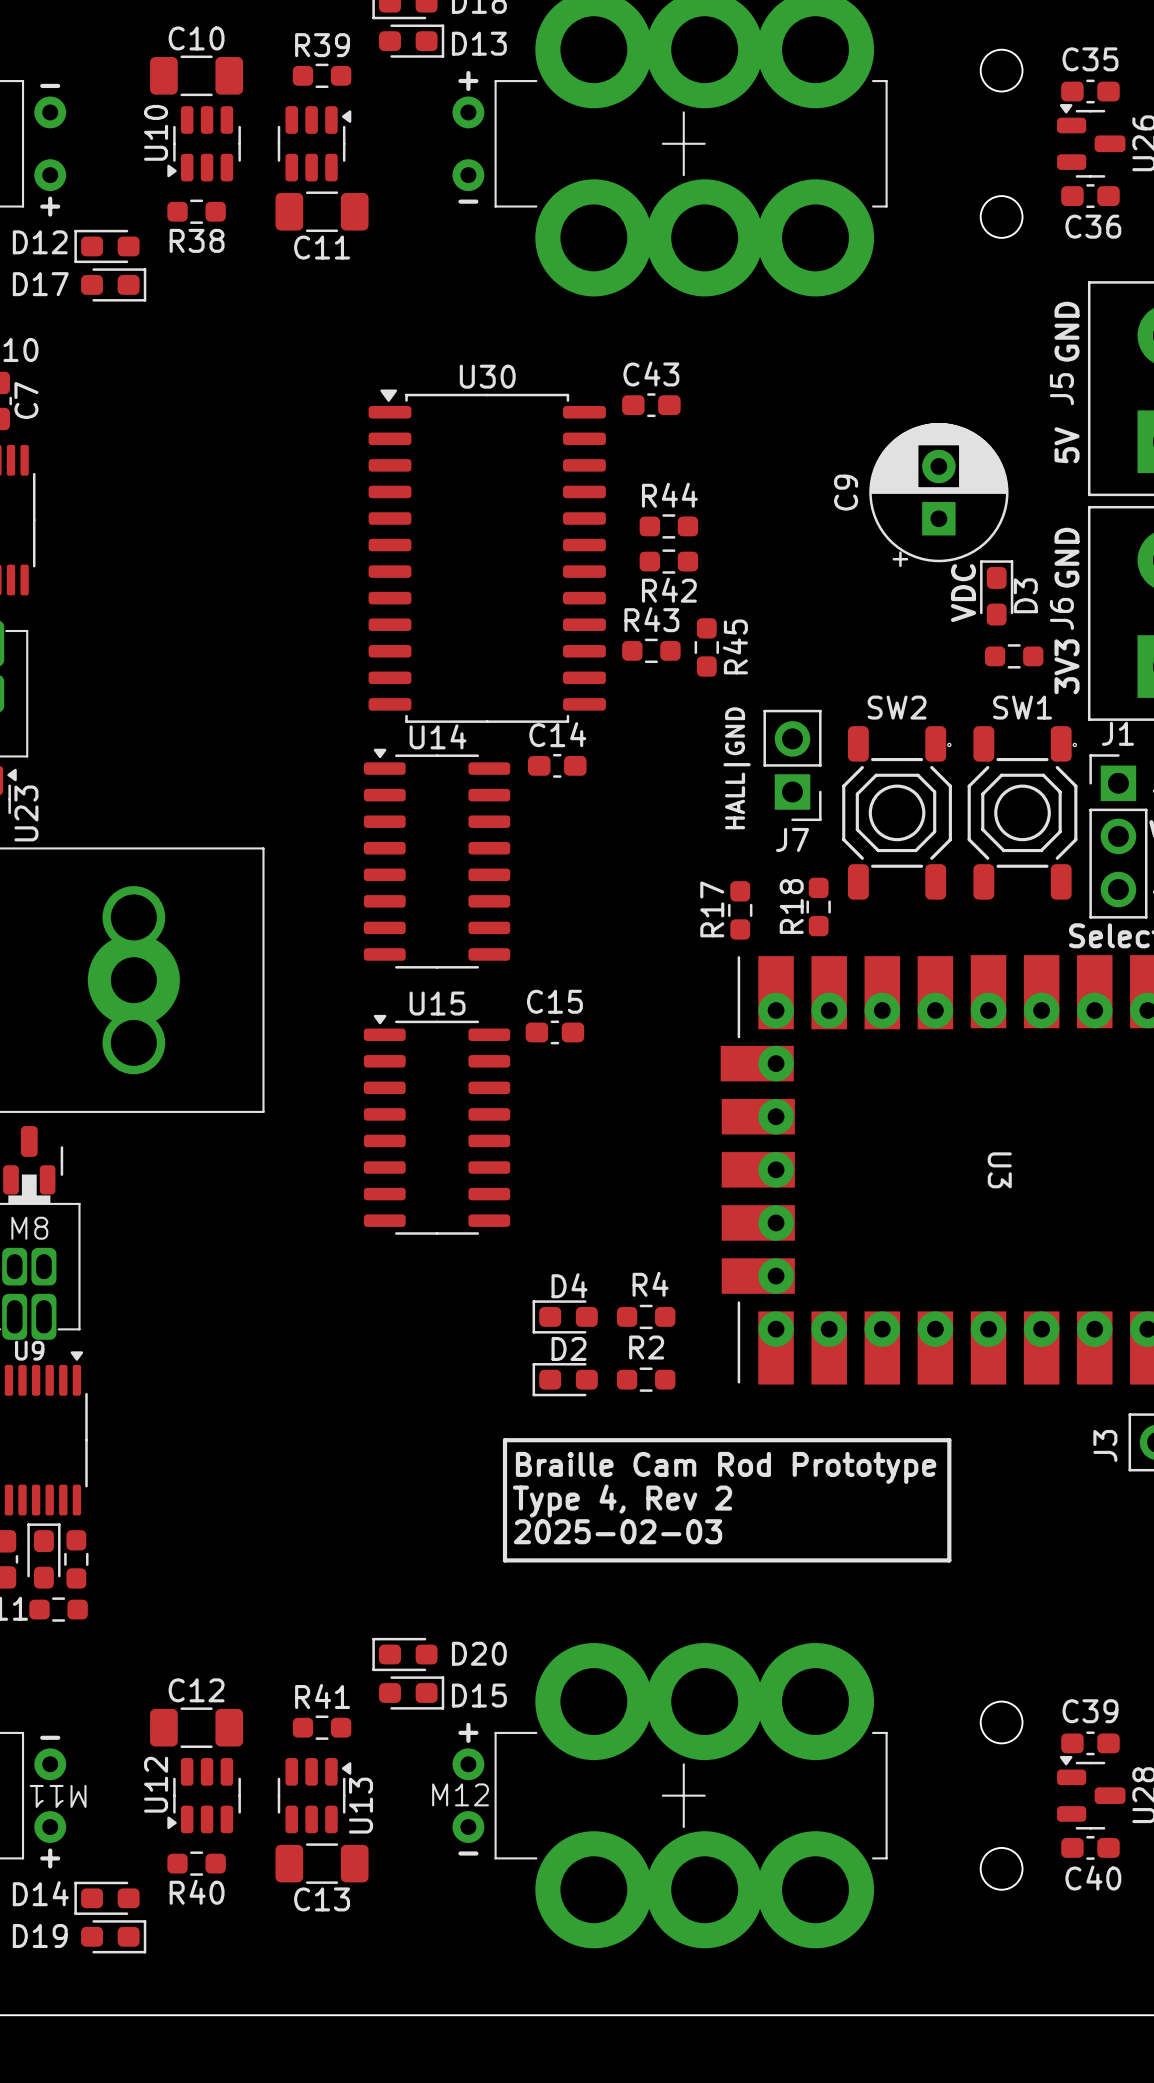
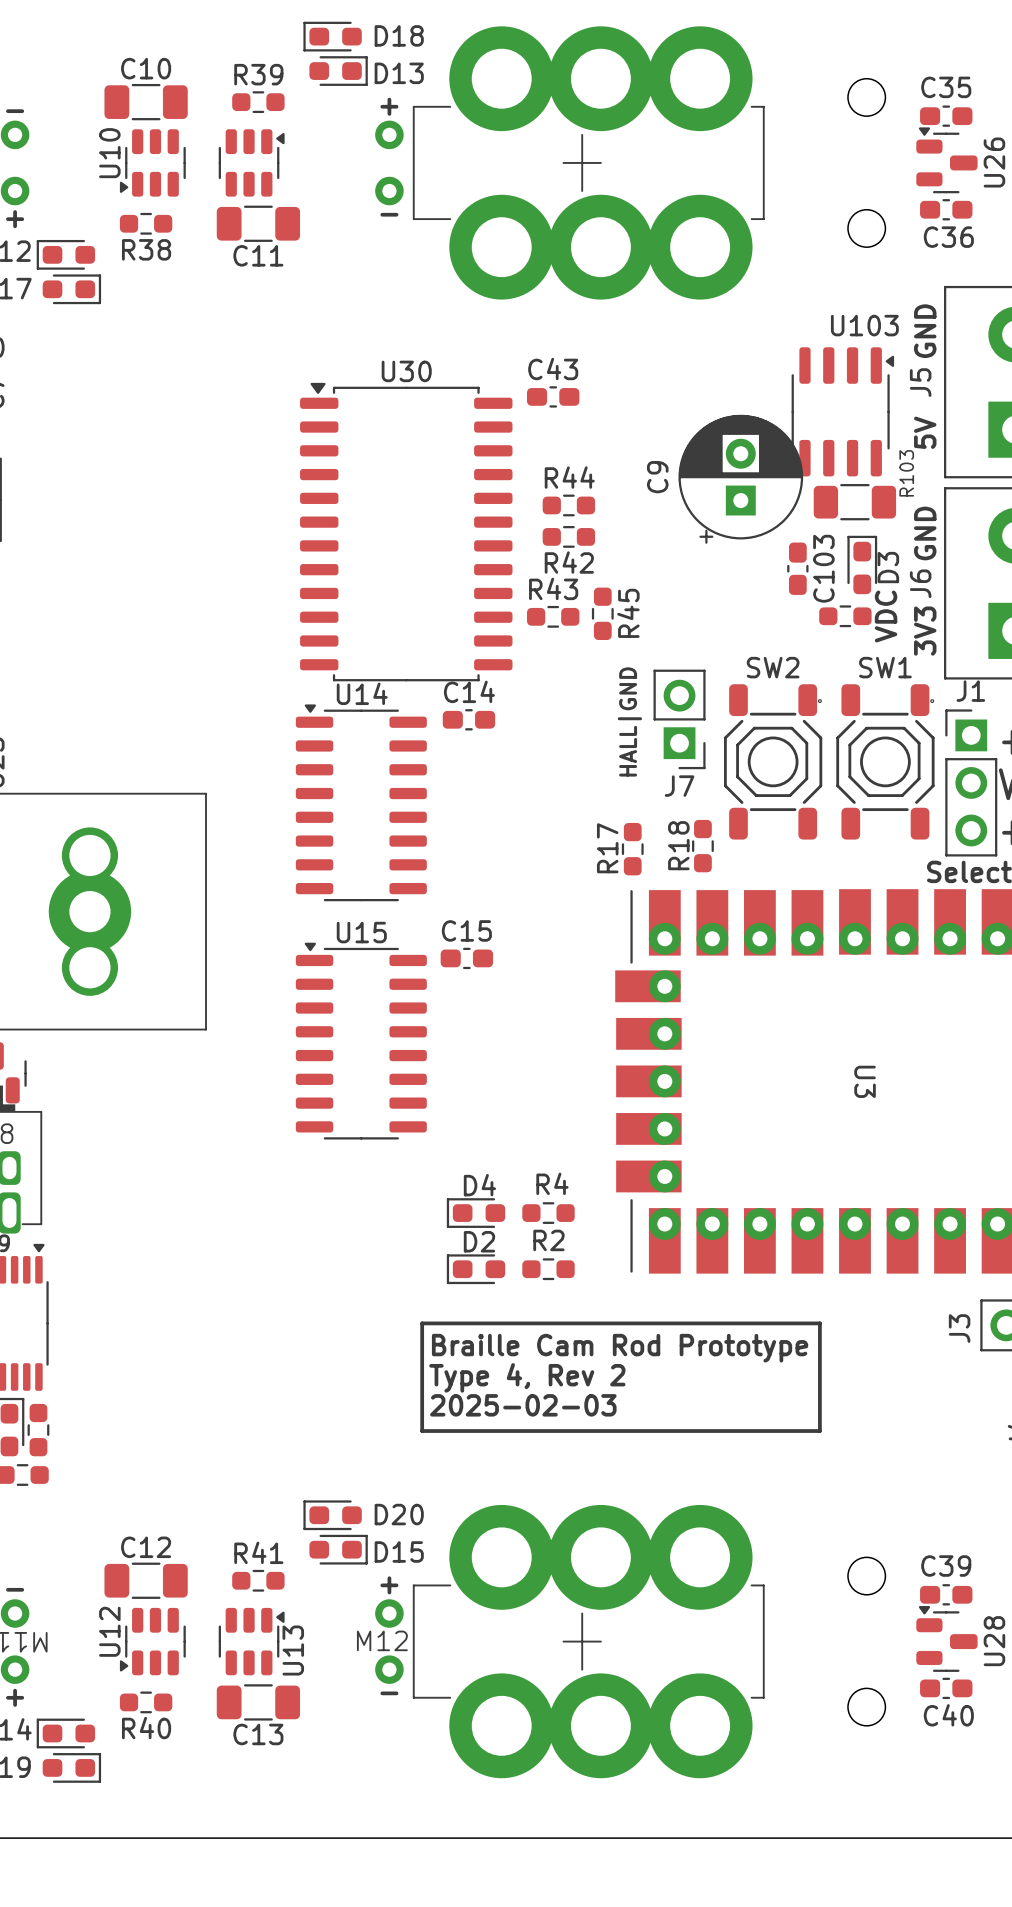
U103: none -> (842, 411)
C9 position: (938, 495) -> (740, 479)
R103: none -> (854, 502)
text position: VDC (963, 593) -> VDC (886, 616)
C103: none -> (797, 568)
part position: (1014, 656) -> (845, 616)

